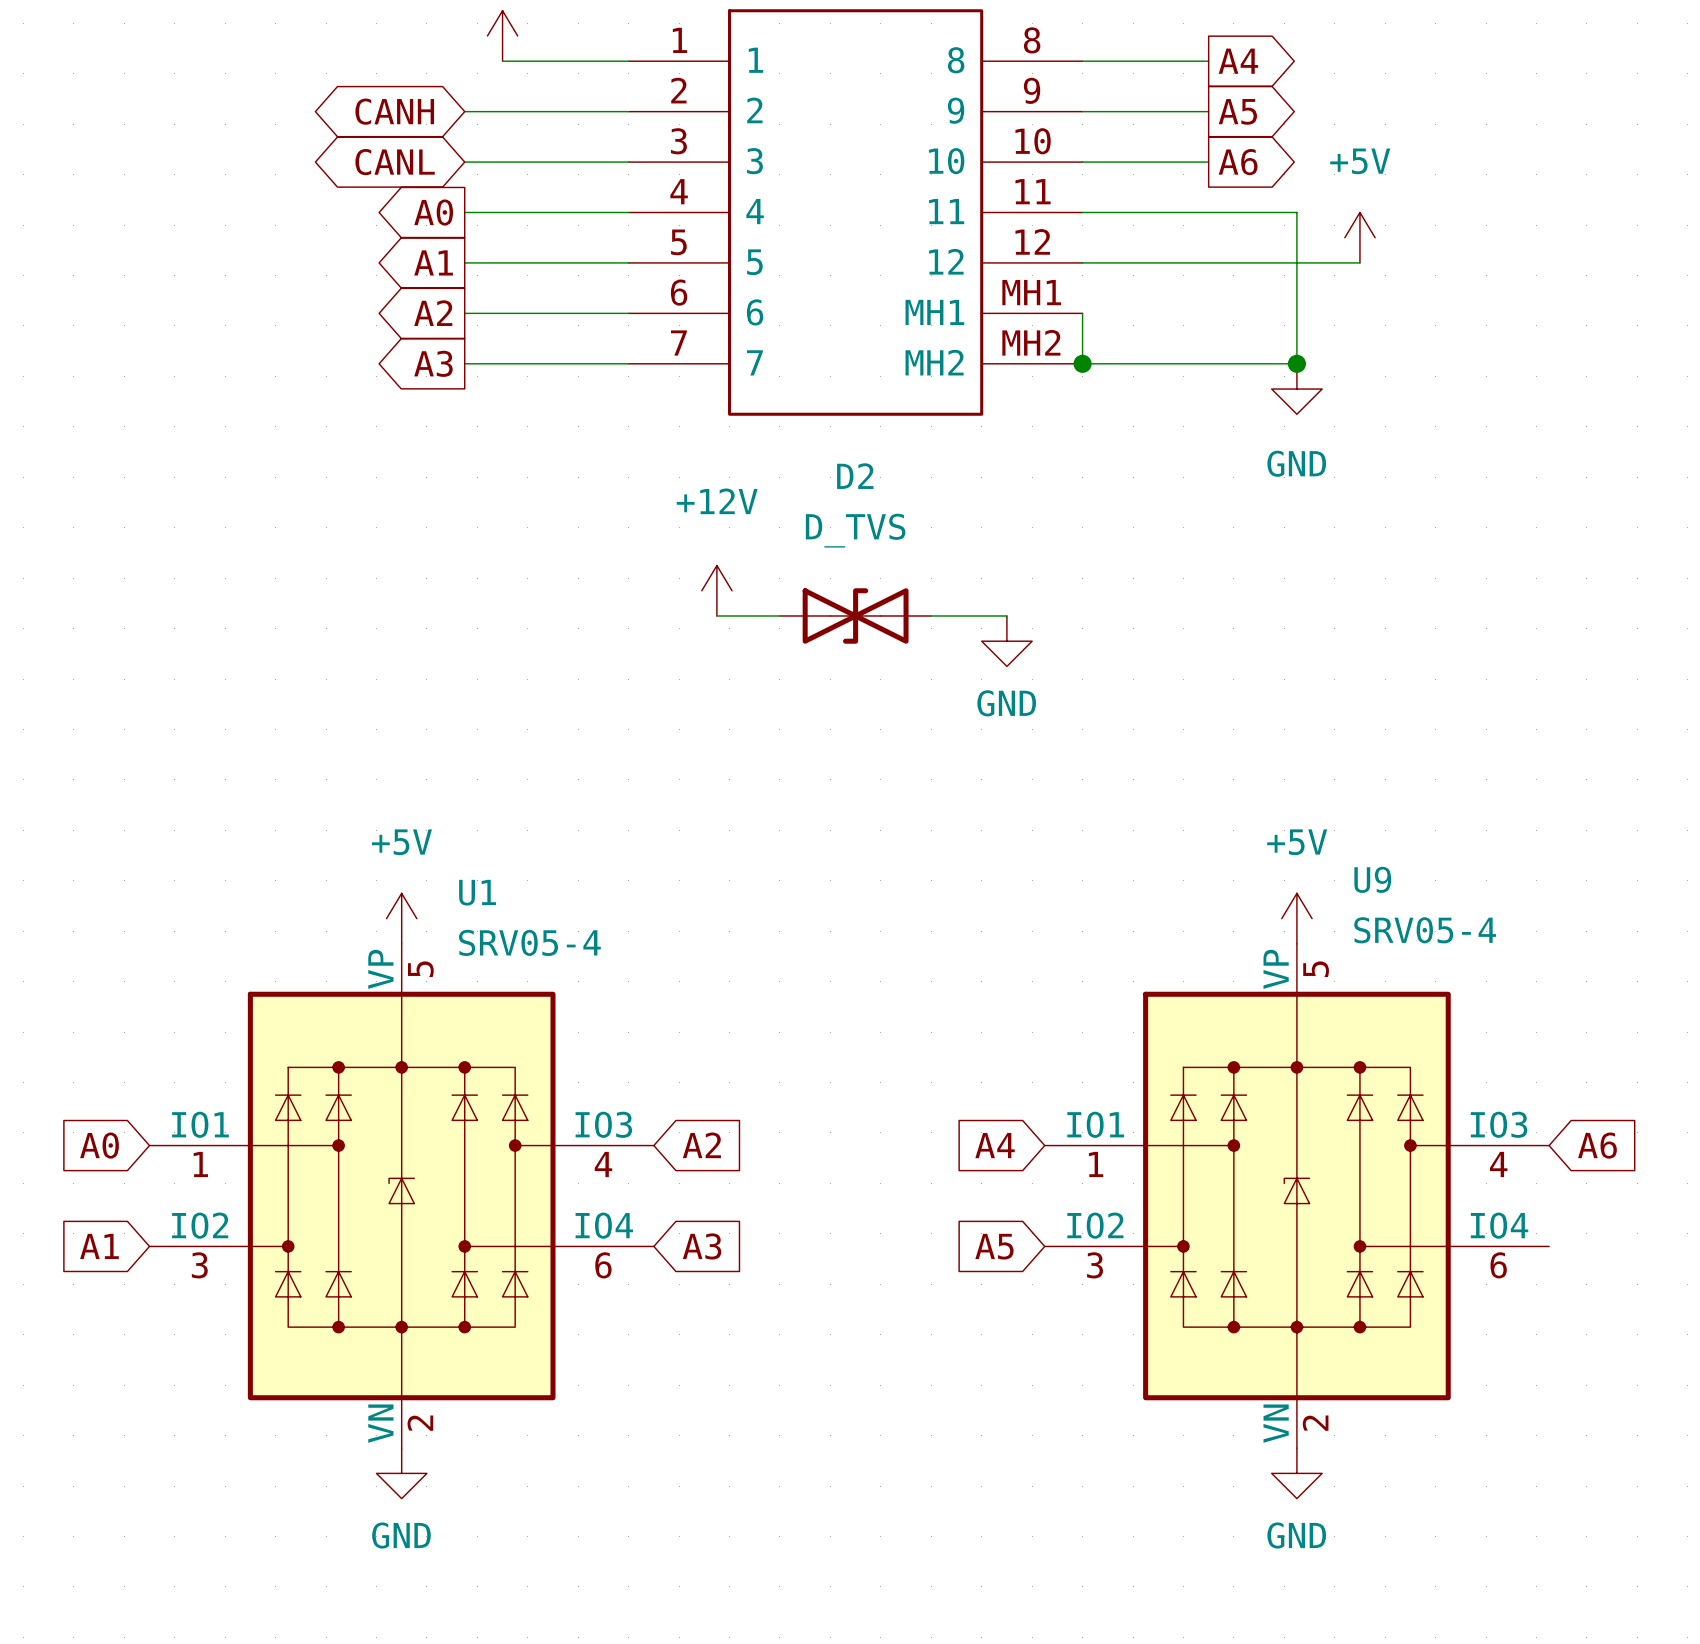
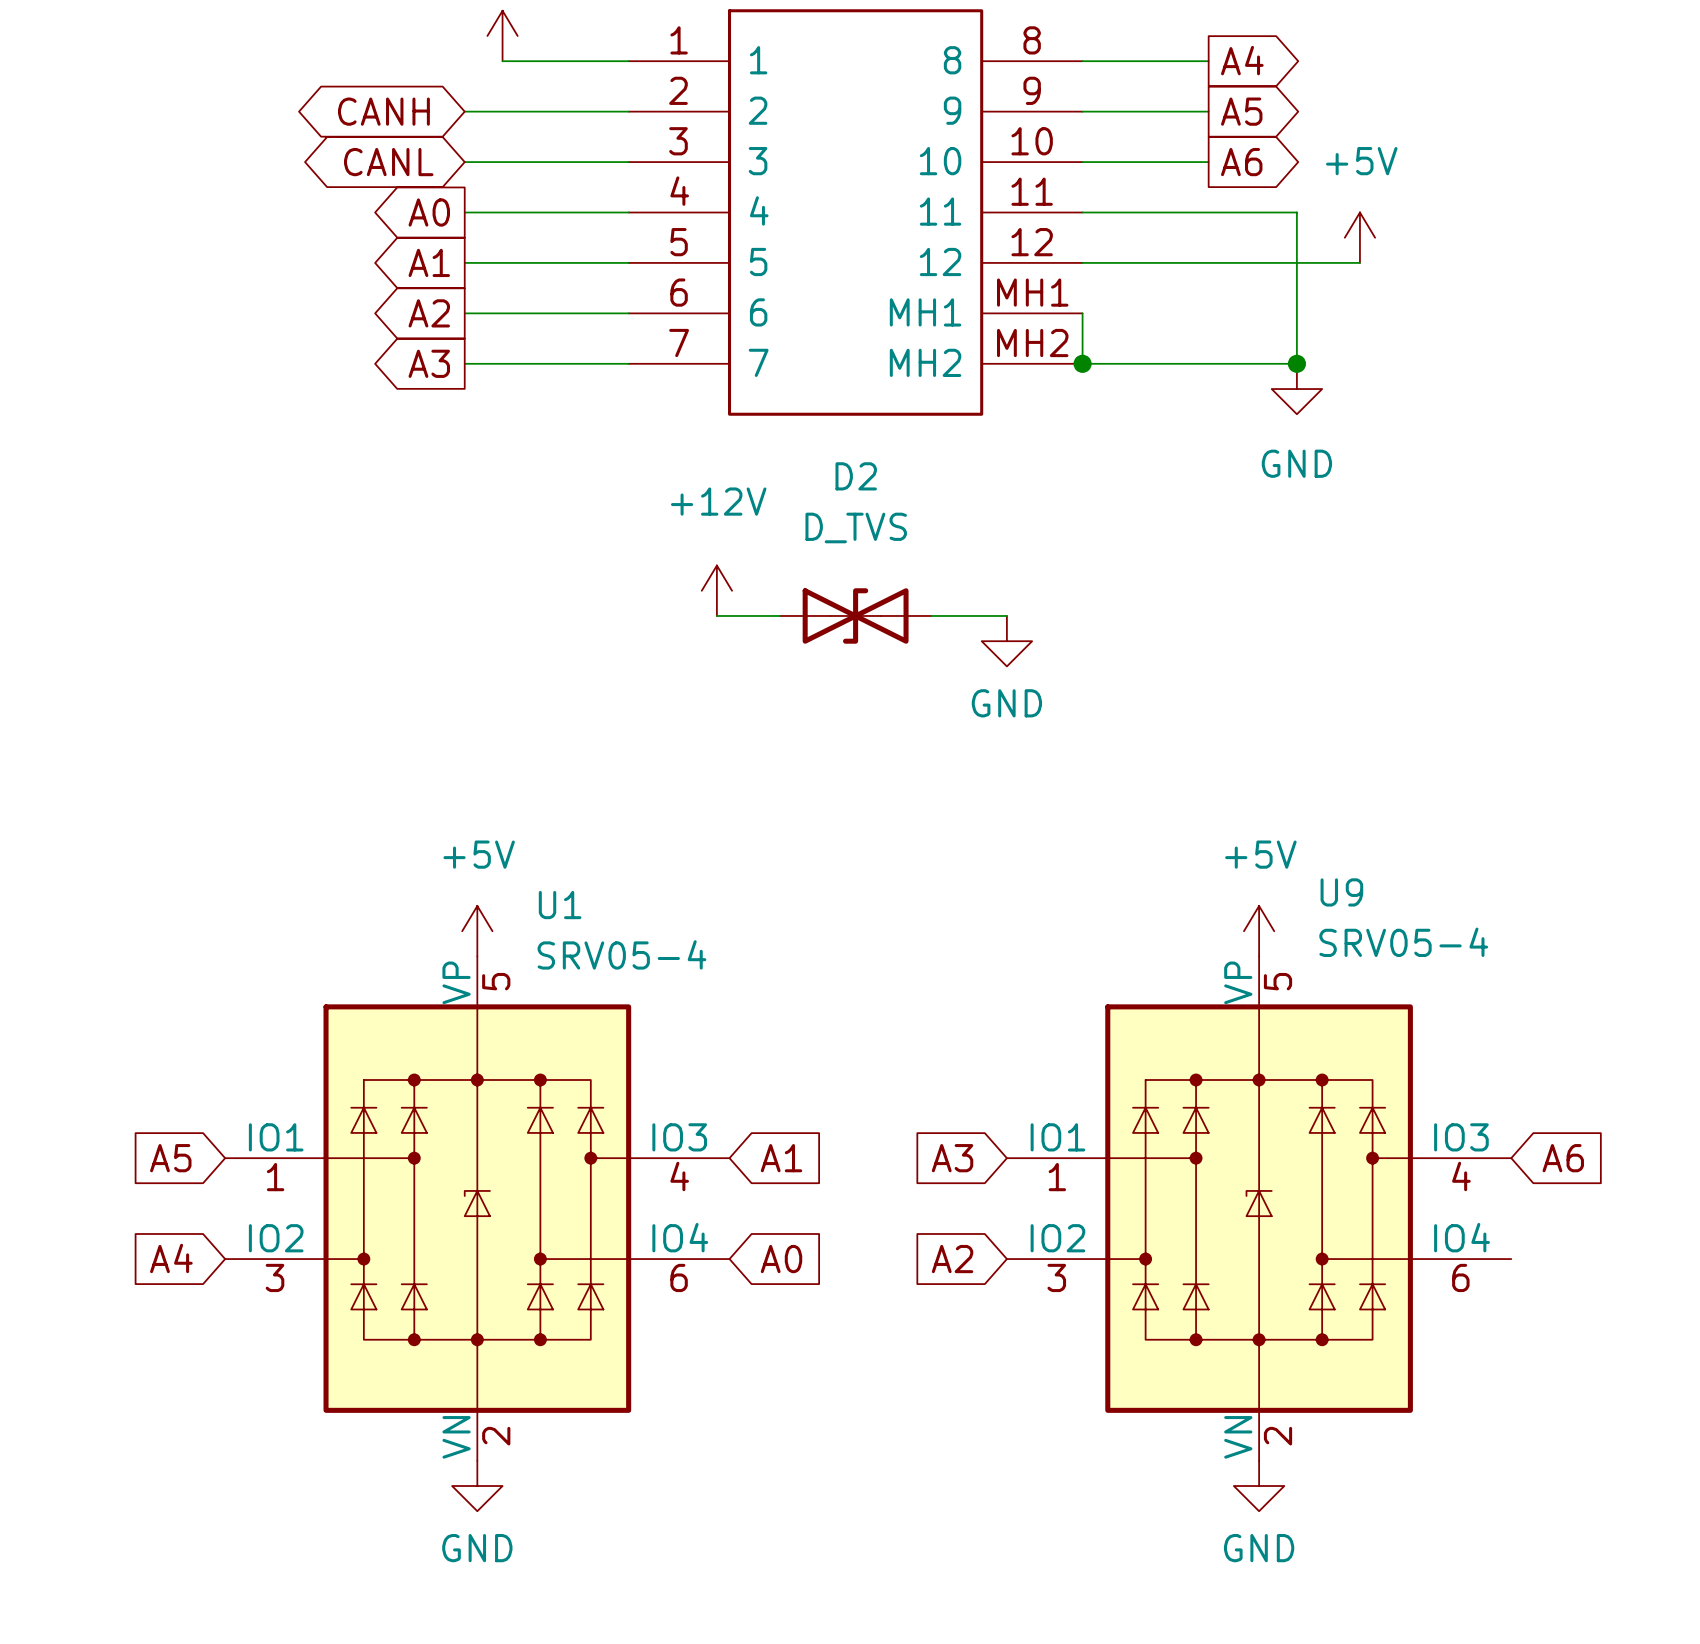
power symbol position: +5V (401, 918) -> +5V (477, 931)
power symbol position: +5V (1296, 918) -> +5V (1259, 931)
global label: A0 (99, 1145) -> none
global label rotation: 0° (701, 1145) -> 180° (952, 1259)
global label position: A2 (701, 1145) -> A2 (952, 1259)
global label: A4 (995, 1145) -> none
global label position: A6 (1597, 1145) -> A6 (1563, 1158)
global label: none -> A5 (170, 1158)
global label: none -> A1 (781, 1158)
U1 position: (401, 1196) -> (477, 1208)
U9 position: (1296, 1196) -> (1259, 1208)
global label: A1 (99, 1246) -> none
global label rotation: 0° (702, 1246) -> 180° (952, 1158)
global label position: A3 (702, 1246) -> A3 (952, 1158)
global label: A5 (994, 1246) -> none
global label: none -> A4 (171, 1258)
global label: none -> A0 (781, 1259)
power symbol position: GND (401, 1473) -> GND (477, 1486)
power symbol position: GND (1296, 1473) -> GND (1259, 1486)

